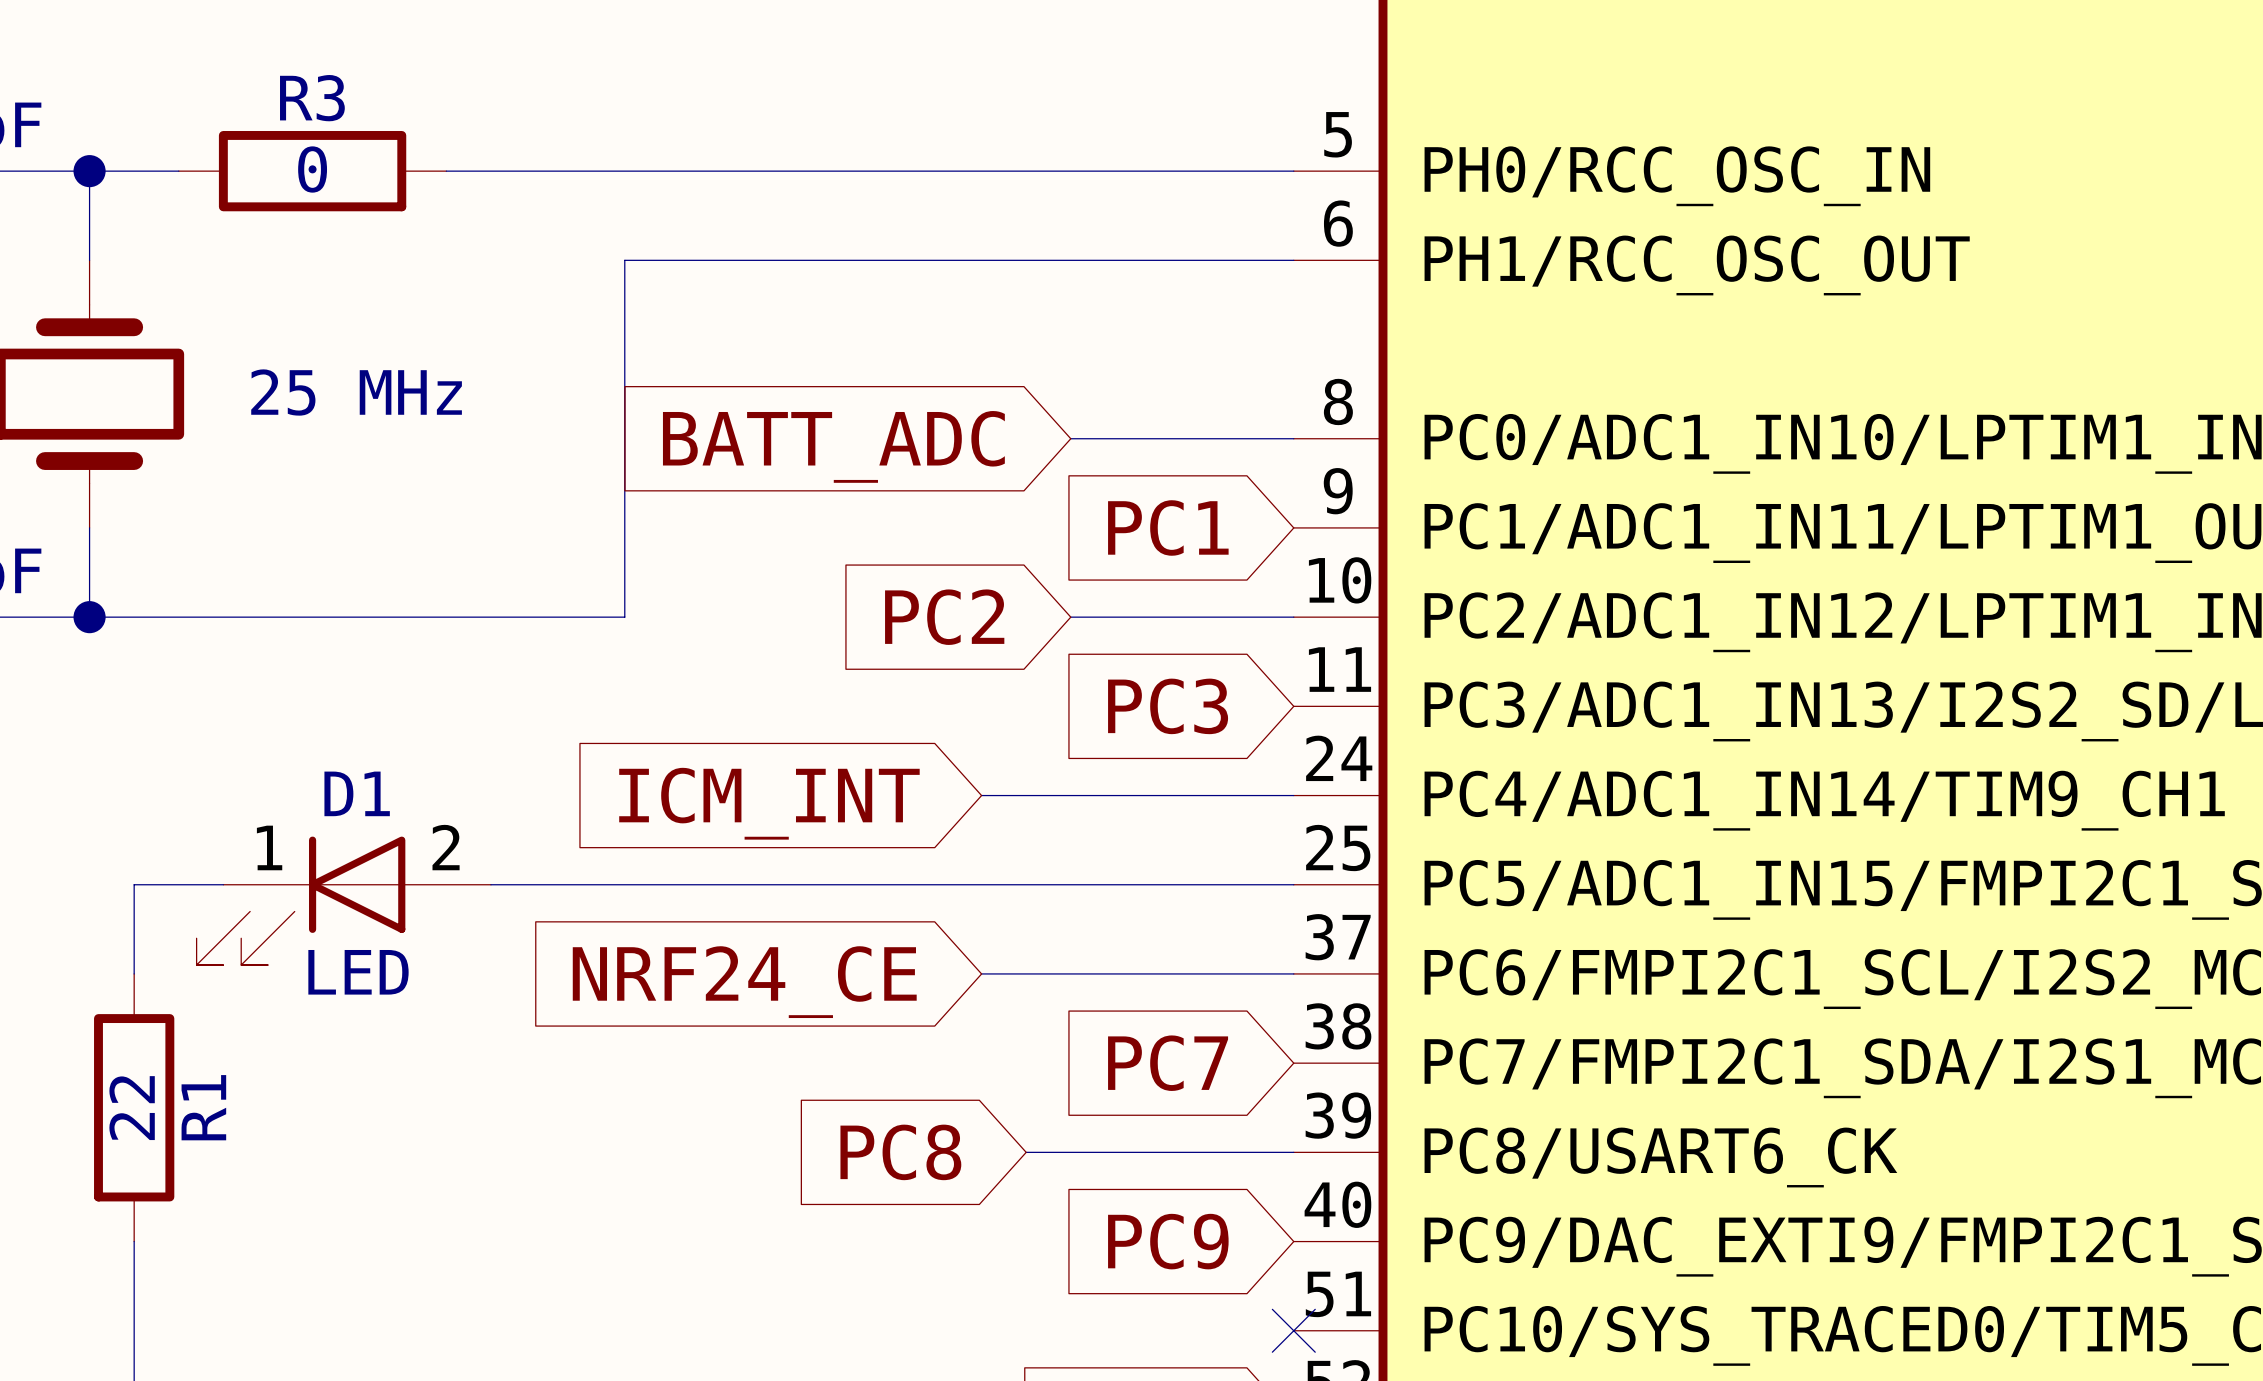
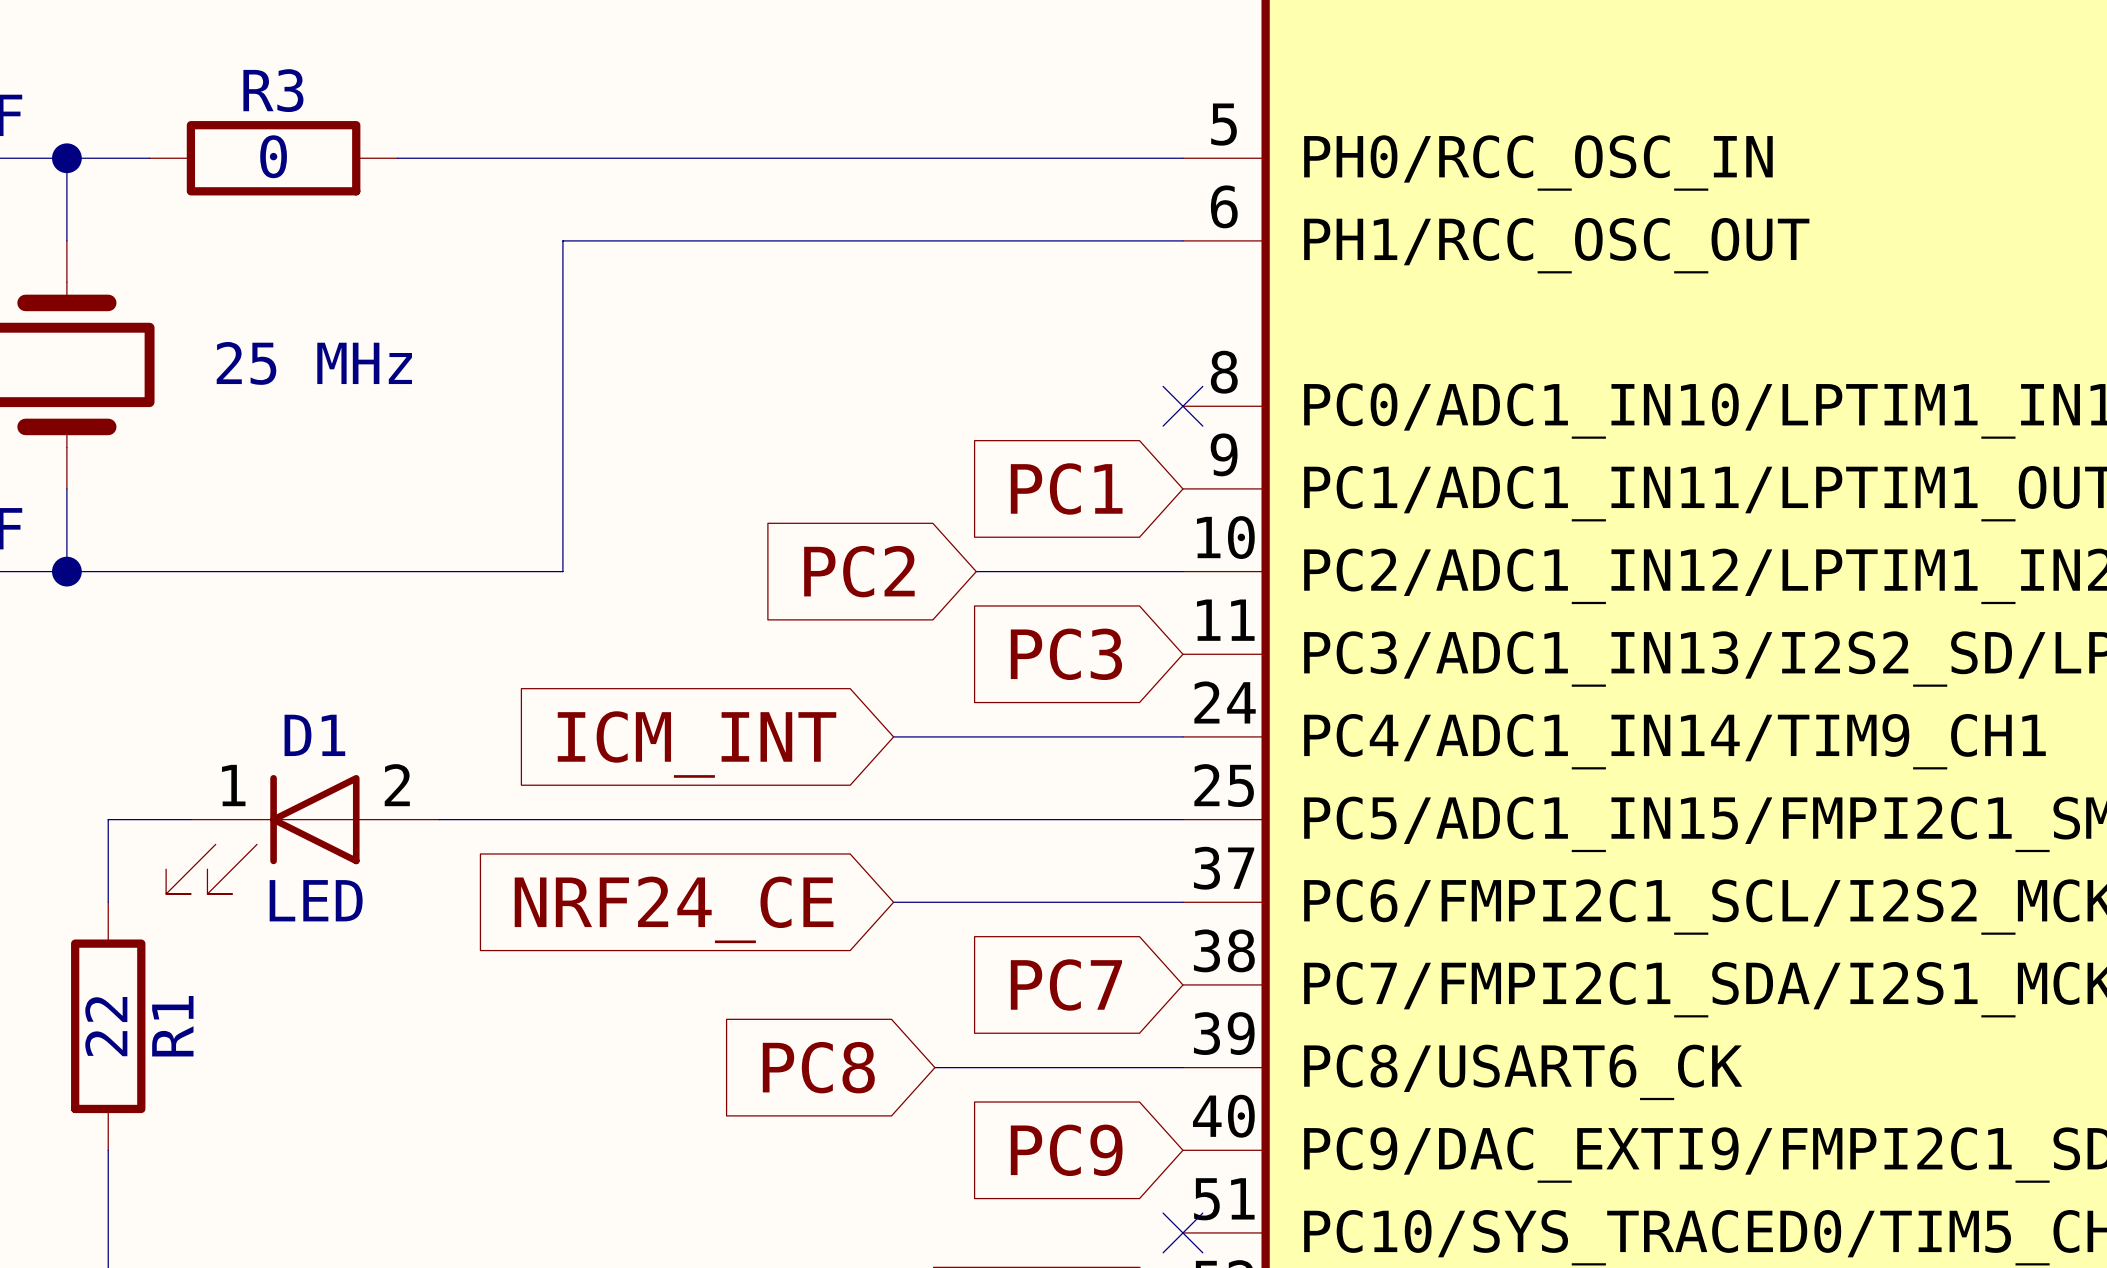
wire: (1070, 438) (1293, 438) -> none
no-connect mark: none -> (1182, 406)
global label: BATT_ADC (833, 446) -> none

